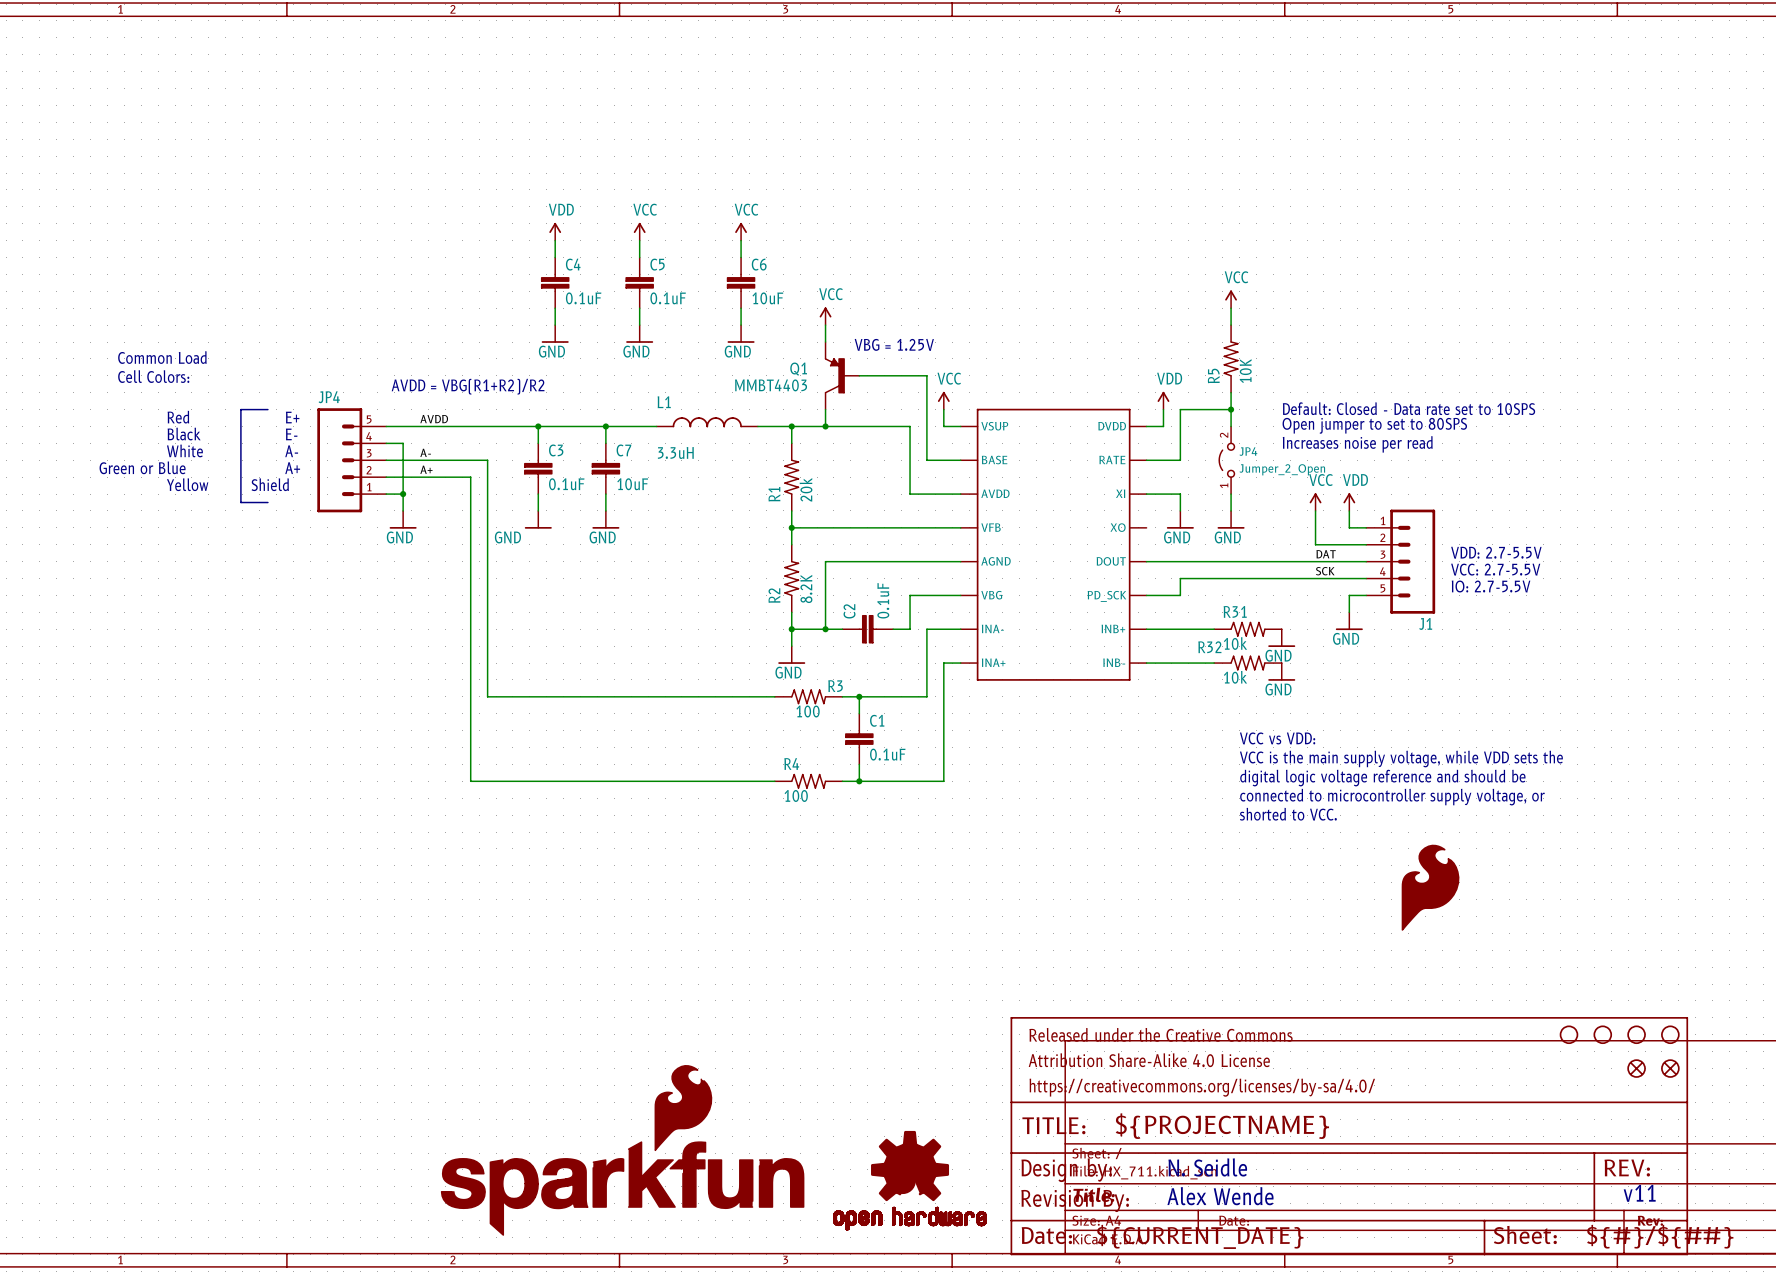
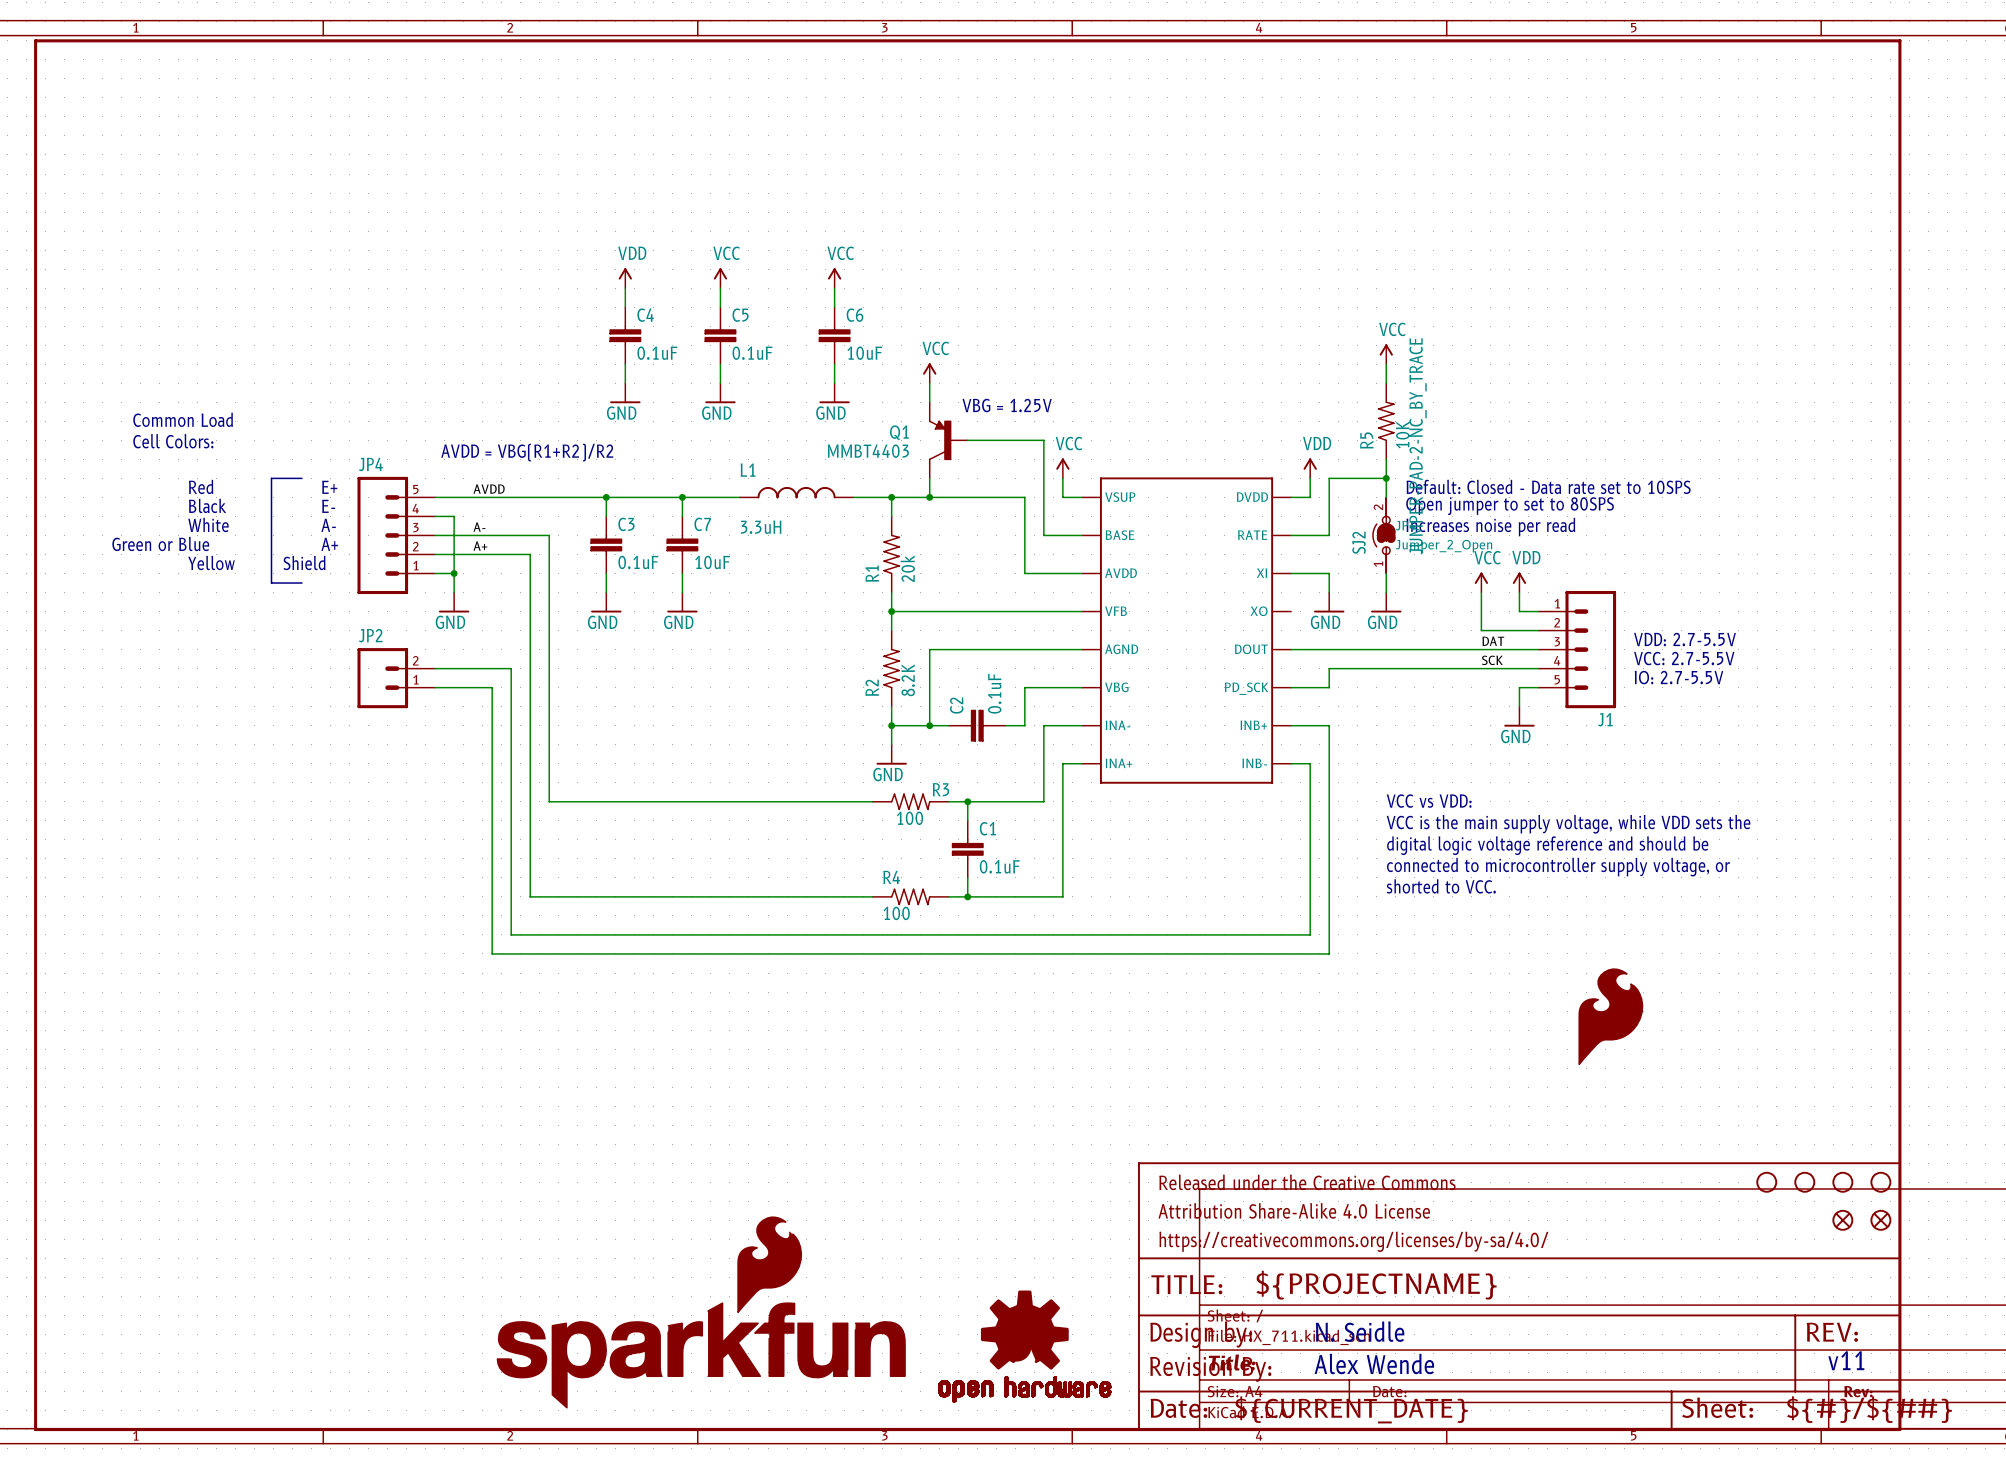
text position: Default: Closed - Data rate set to 10SPS (1409, 408) -> Default: Closed - Data rate set to 10SPS (1548, 486)
text position: Open jumper to set to 80SPS (1374, 425) -> Open jumper to set to 80SPS (1510, 506)
text position: Increases noise per read (1357, 444) -> Increases noise per read (1490, 527)
SJ2: none -> JUMPER-PAD-2-NC_BY_TRACE (1386, 535)
power symbol text position: GND (507, 537) -> GND (602, 622)
JP2: none -> (396, 678)
wire: (1180, 629) (1214, 629) -> (1329, 725) (1329, 953) (492, 953) (492, 687) (435, 687)
R31: 10k (1247, 629) -> none
part: none -> (967, 735)
power symbol: GND (1281, 638) -> none
wire: (1163, 663) (1214, 663) -> (1310, 763) (1310, 934) (511, 934) (511, 668) (435, 668)
R32: 10k (1247, 663) -> none
power symbol: GND (1281, 671) -> none
text position: VCC vs VDD: (1277, 738) -> VCC vs VDD: (1429, 801)
text position: VCC is the main supply voltage, while VDD sets the (1401, 759) -> VCC is the main supply voltage, while VDD sets the (1568, 824)
text position: digital logic voltage reference and should be (1382, 778) -> digital logic voltage reference and should be (1547, 845)
text position: connected to microcontroller supply voltage, or (1392, 797) -> connected to microcontroller supply voltage, or (1558, 867)
text position: shorted to VCC. (1288, 814) -> shorted to VCC. (1441, 886)

